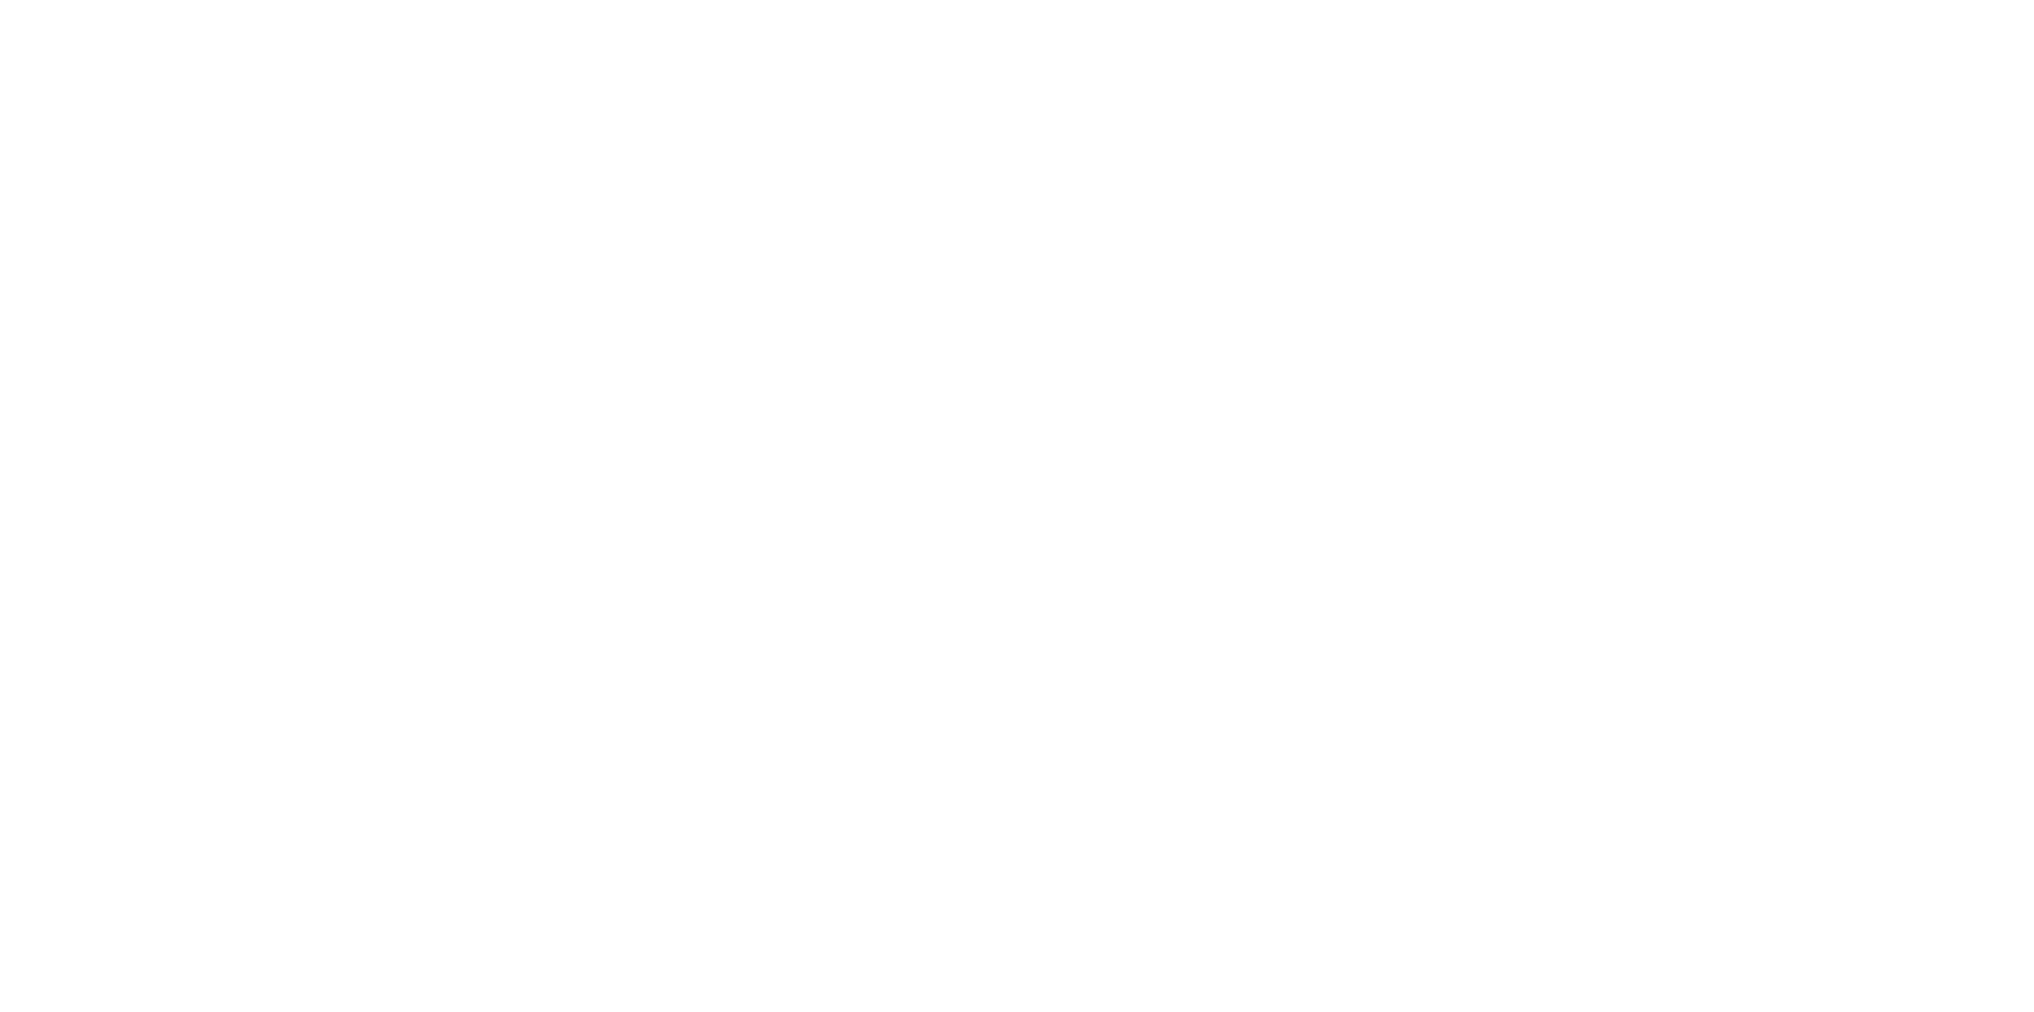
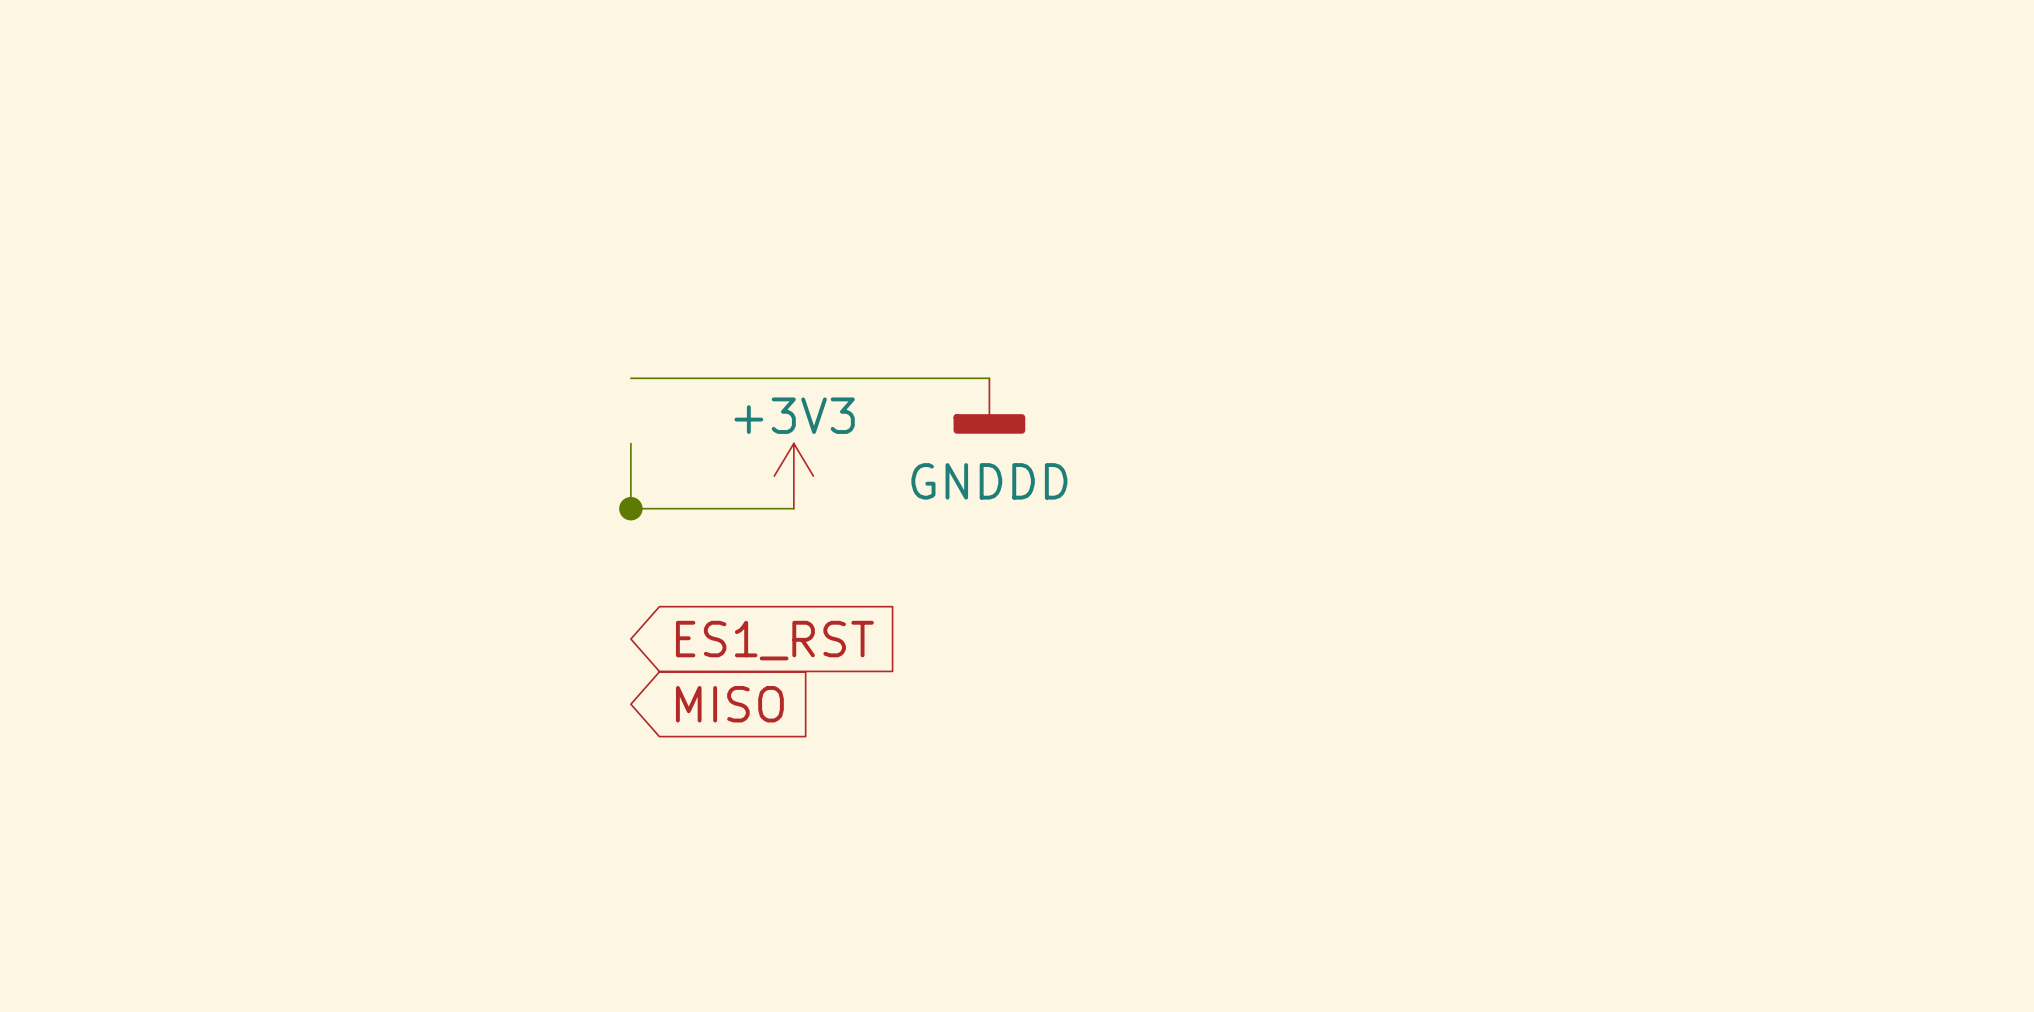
wire: none -> (630, 378) (989, 378)
power symbol: none -> GNDDD (989, 406)
wire: none -> (630, 443) (630, 508) (793, 508)
power symbol: none -> +3V3 (793, 476)
junction: none -> (630, 508)
global label: none -> ES1_RST (774, 640)
global label: none -> MISO (729, 704)

